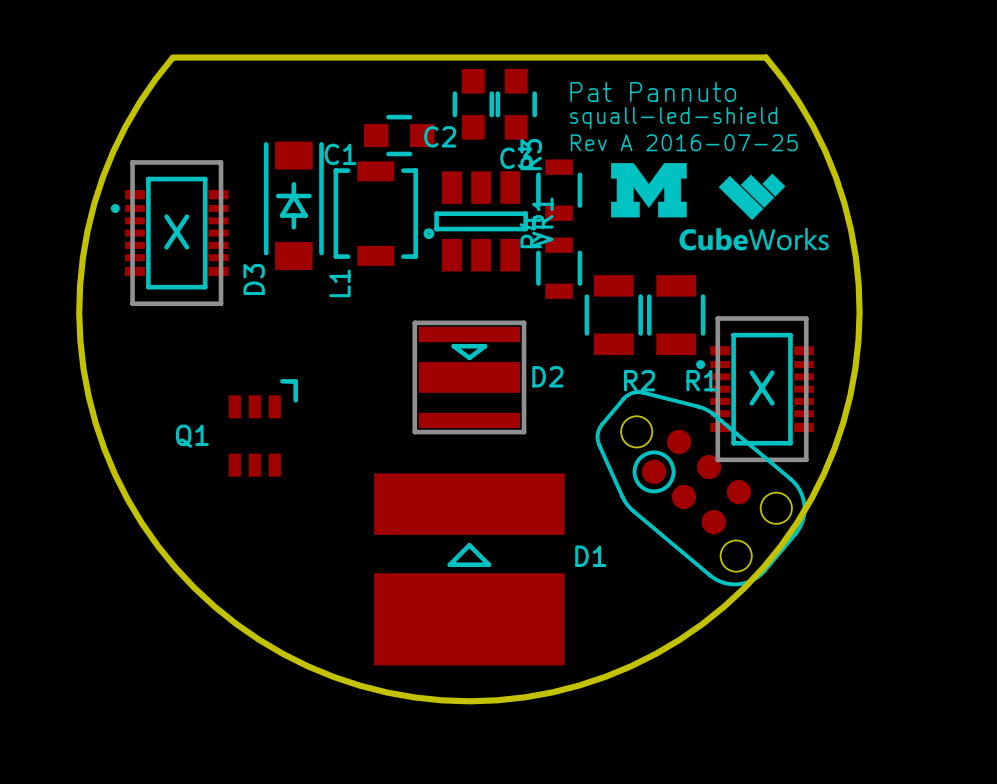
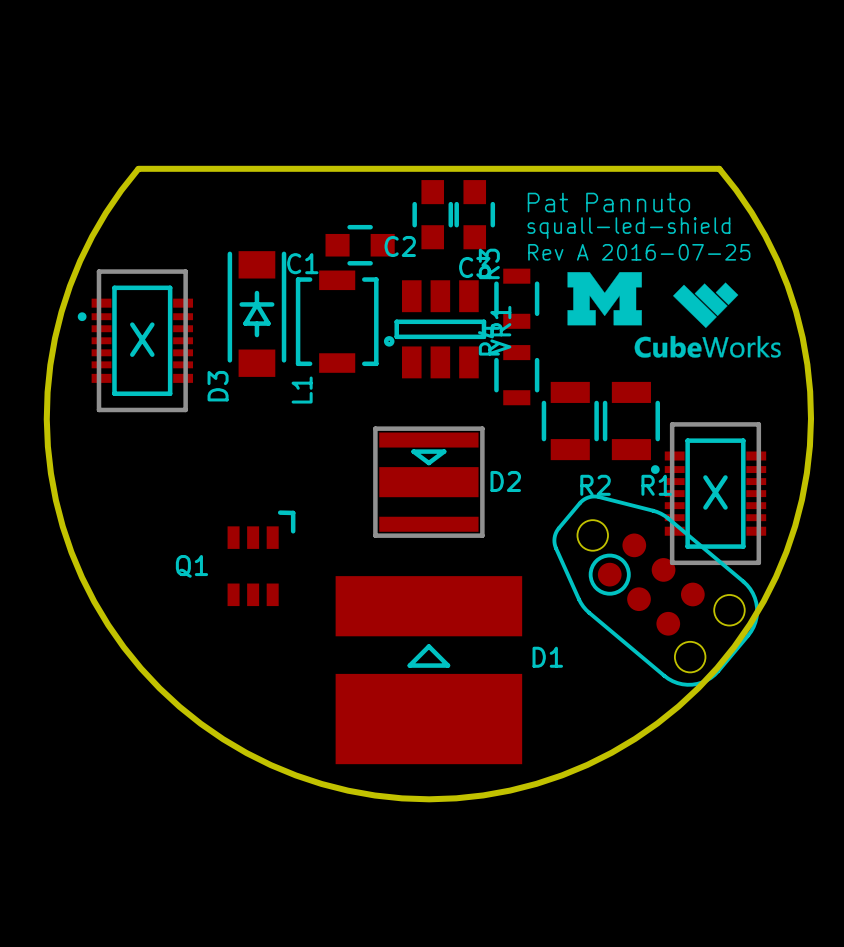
Q1 position: (263, 427) -> (261, 558)

